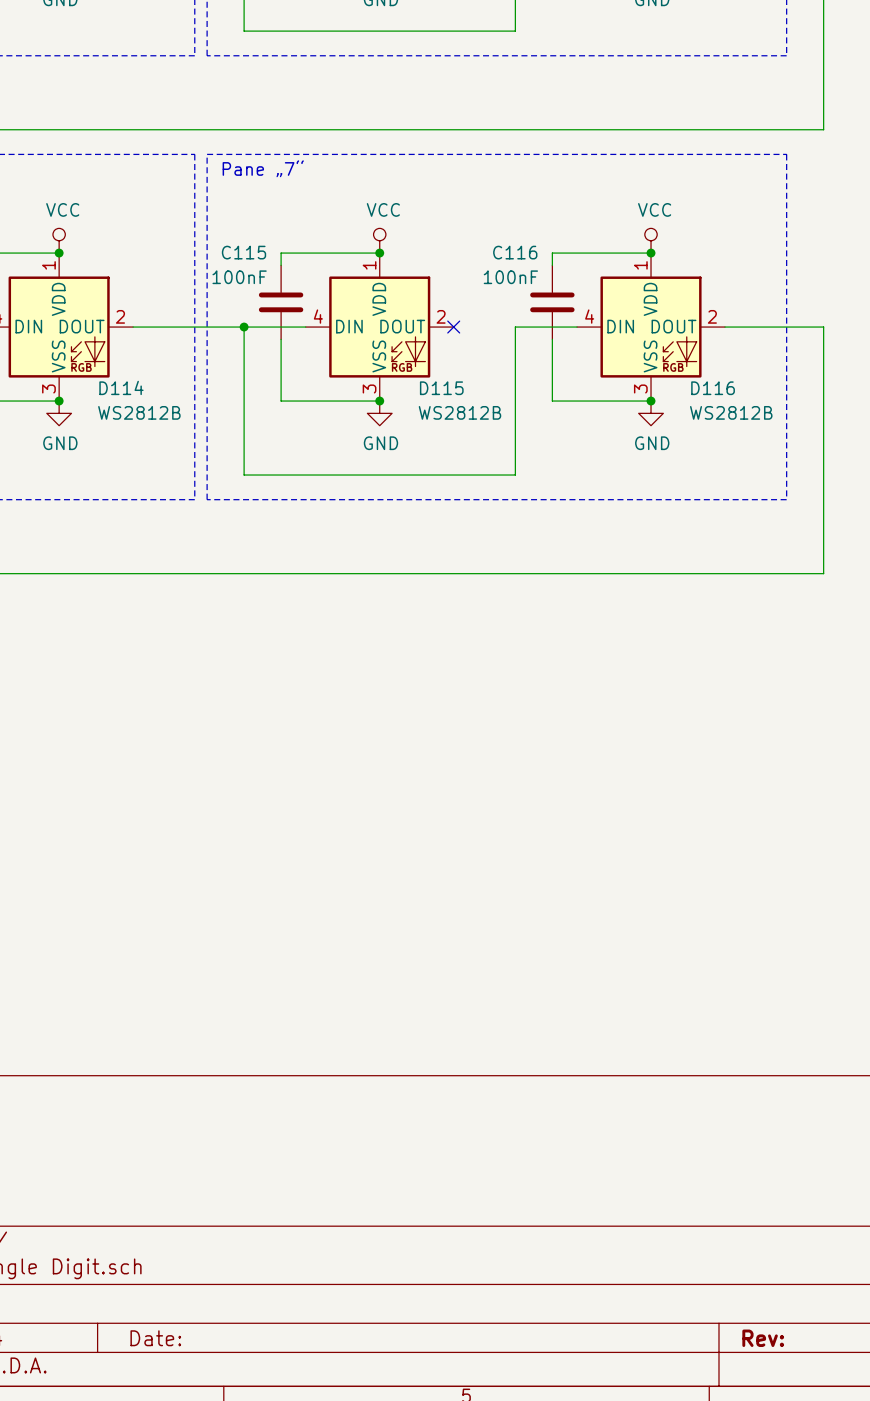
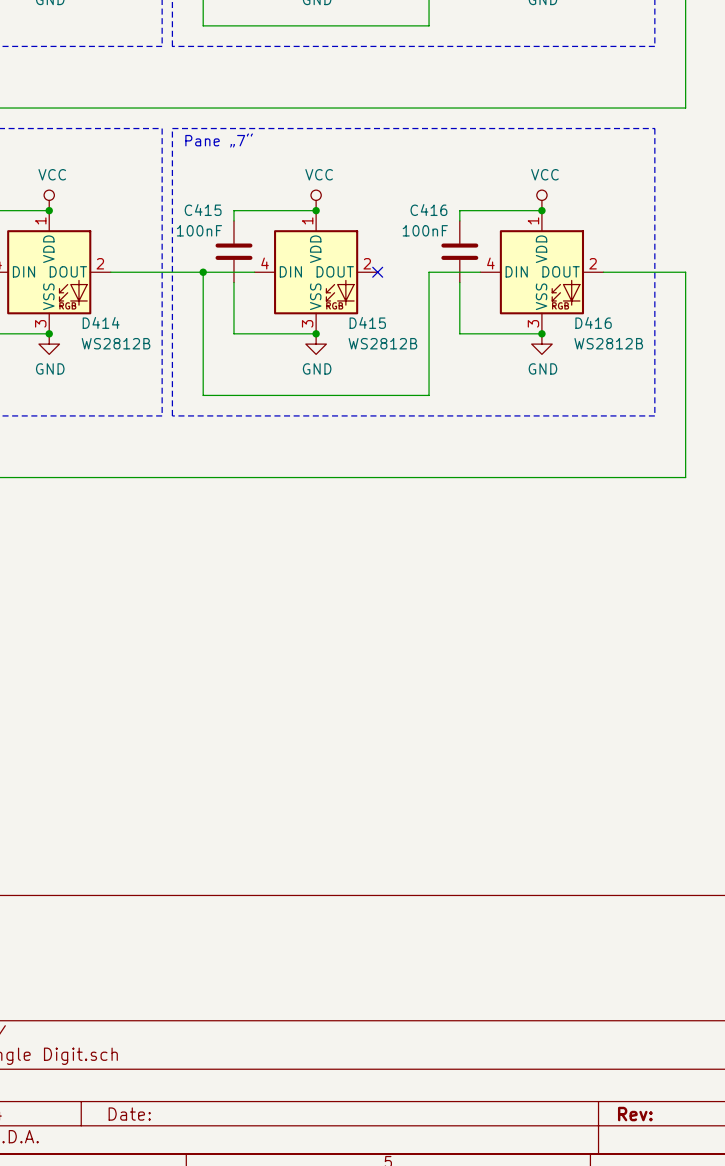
C115 name: C115 (244, 252) -> C415 (203, 210)
C116 name: C116 (515, 252) -> C416 (428, 210)
D114 name: D114 (121, 387) -> D414 (101, 322)
D115 name: D115 (441, 388) -> D415 (367, 322)
D116 name: D116 (713, 388) -> D416 (593, 322)

